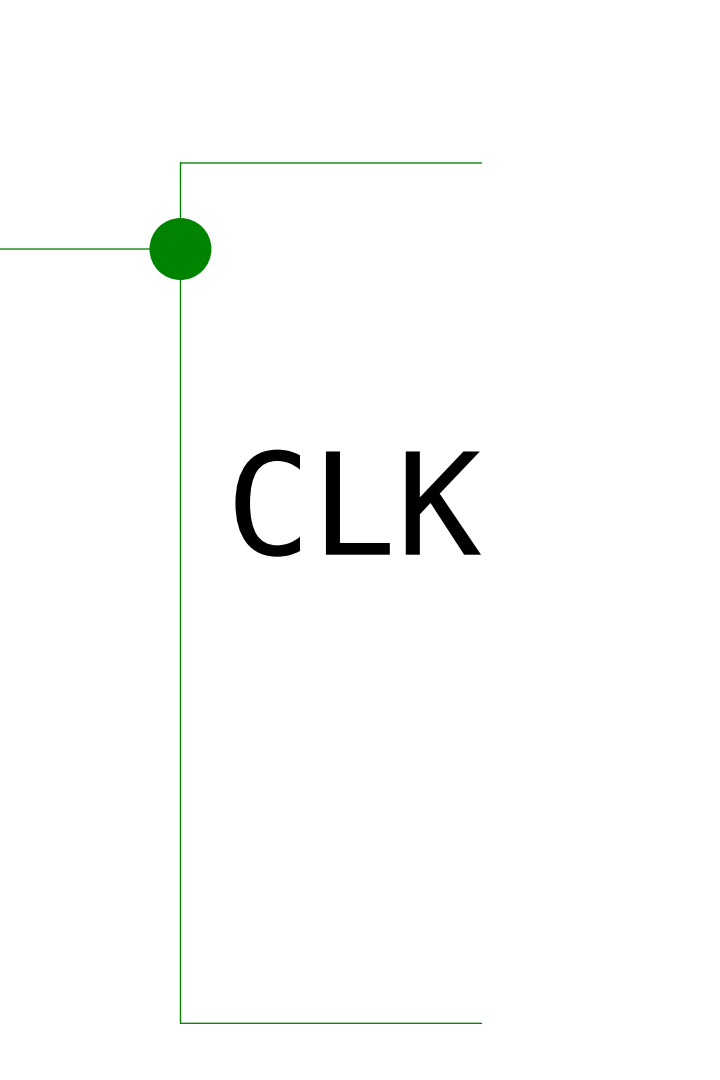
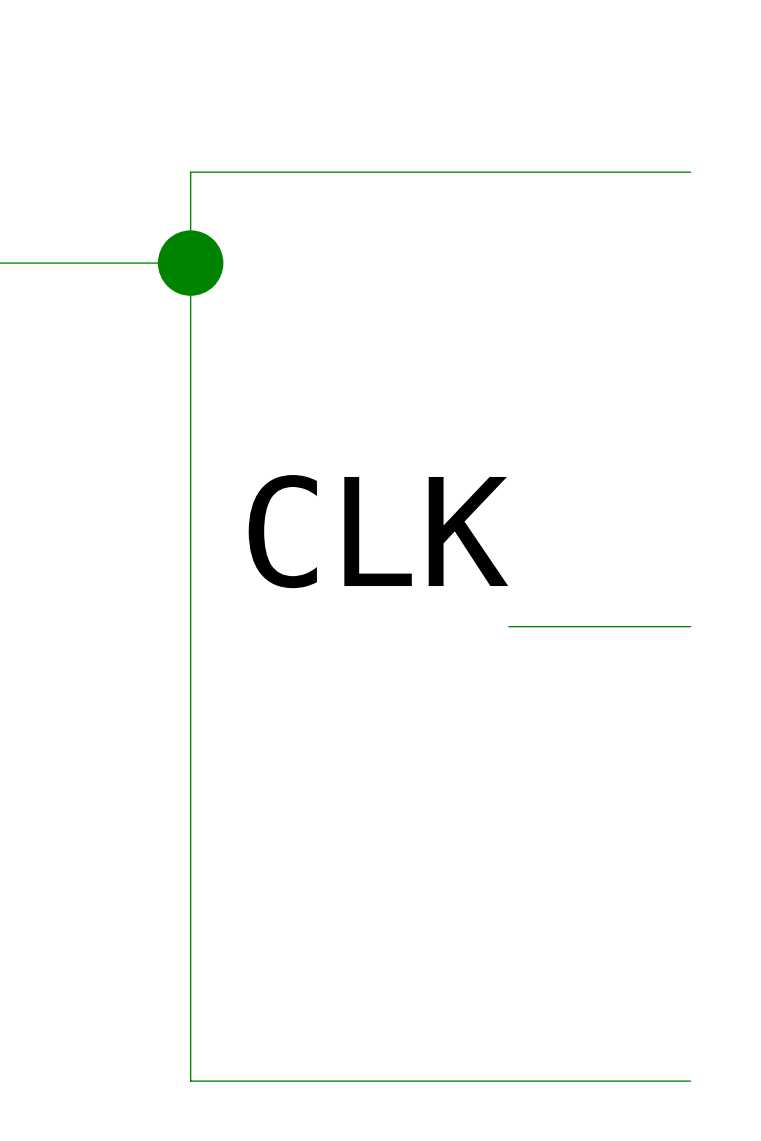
wire: none -> (508, 172) (690, 172)
wire: none -> (508, 626) (690, 626)
wire: none -> (508, 1081) (690, 1081)

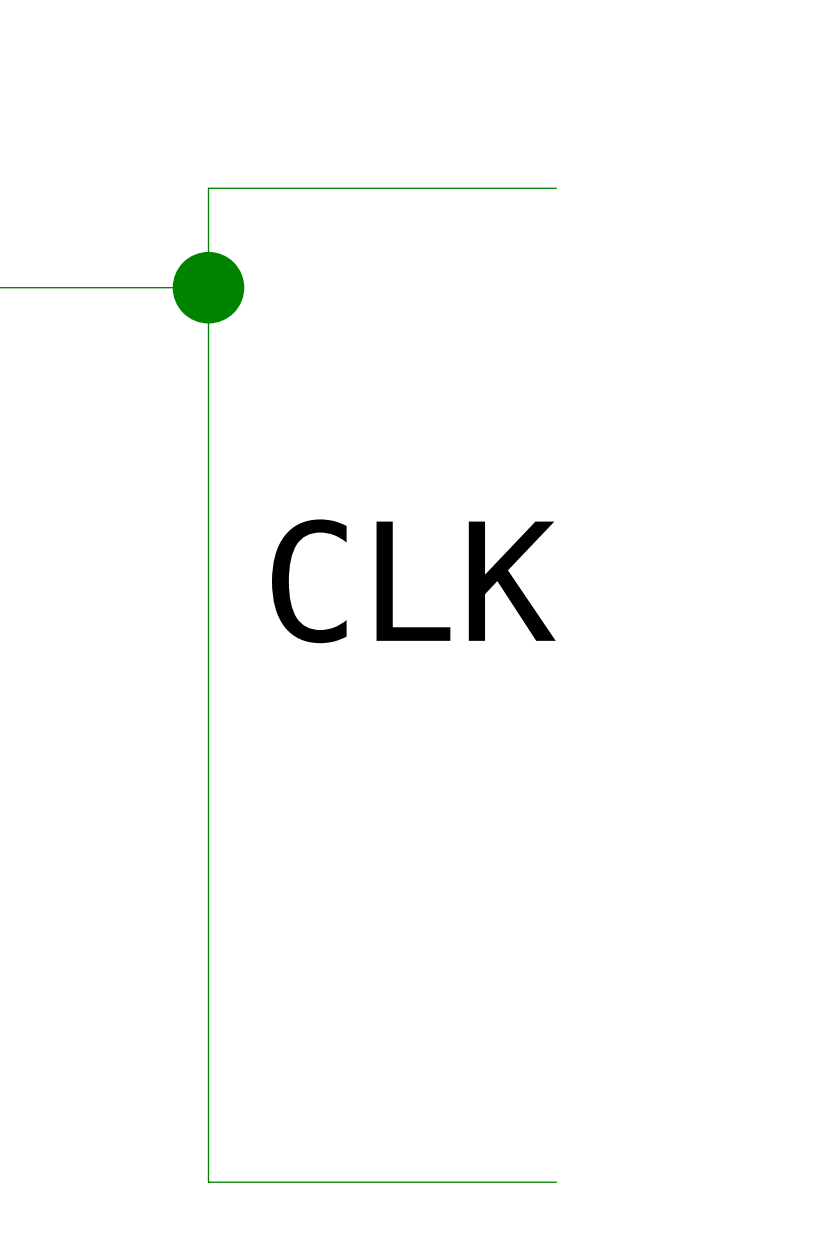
wire: (508, 172) (690, 172) -> none
wire: (508, 626) (690, 626) -> none
wire: (508, 1081) (690, 1081) -> none

